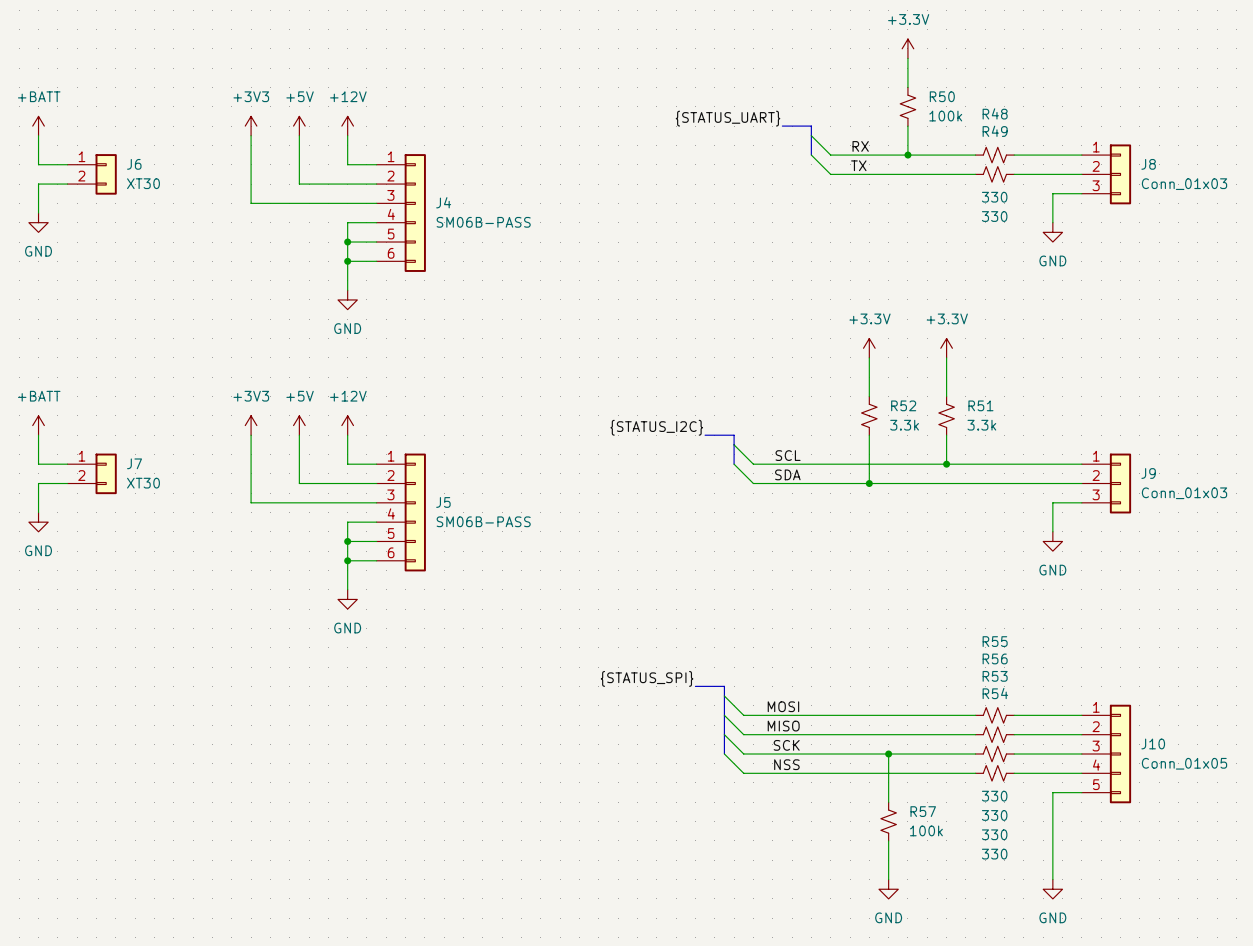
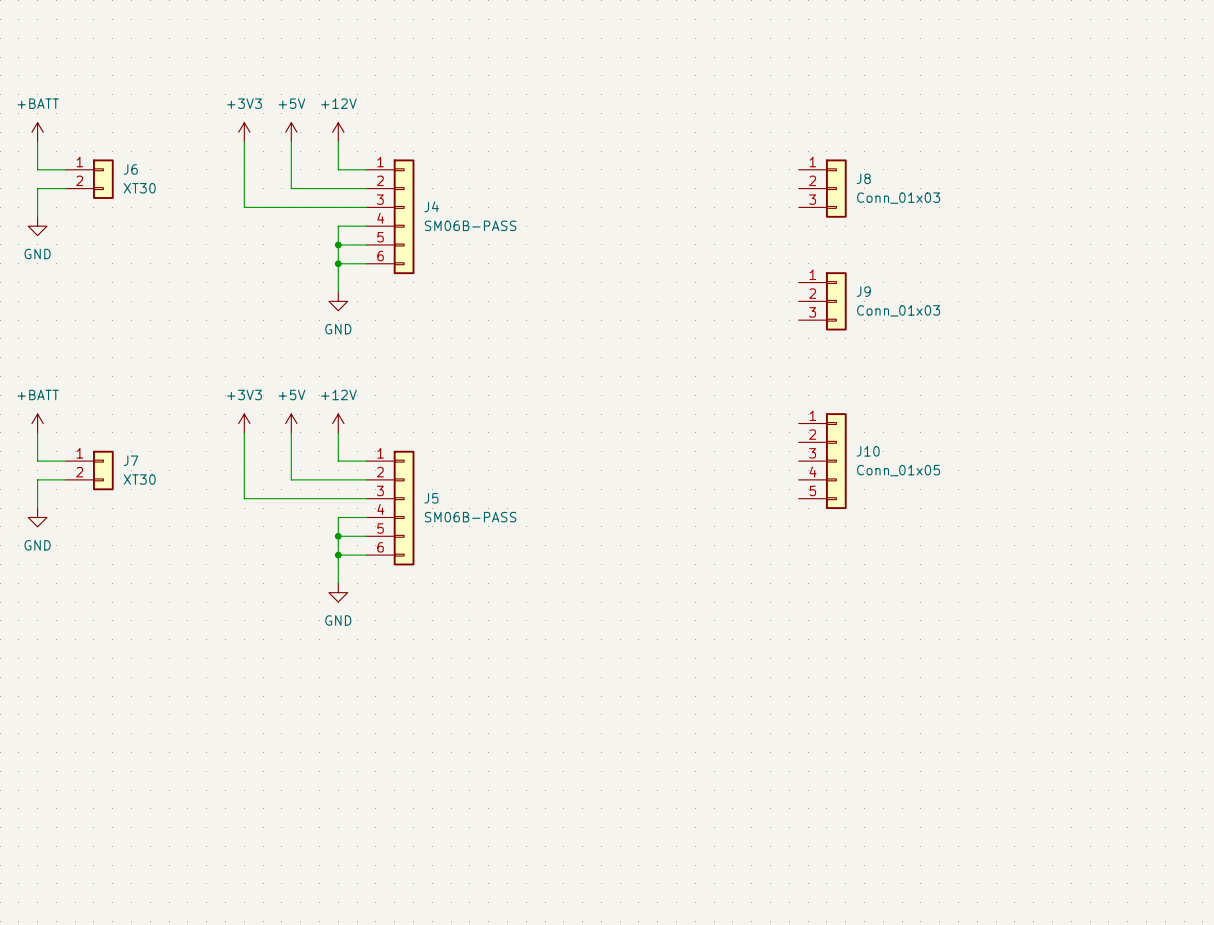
power symbol: +3.3V (907, 48) -> none
wire: (907, 58) (907, 87) -> none
R50: 100k (907, 106) -> none
label: {STATUS_UART} (728, 118) -> none
bus: (782, 126) (811, 126) (811, 155) -> none
wire: (907, 126) (907, 155) -> none
wire: (811, 135) (830, 155) (975, 155) -> none
label: RX (860, 146) -> none
wire: (811, 155) (830, 174) (975, 174) -> none
junction: (907, 155) -> none
R48: 330 (994, 155) -> none
wire: (1014, 155) (1081, 155) -> none
label: TX (858, 165) -> none
R49: 330 (994, 174) -> none
wire: (1014, 174) (1081, 174) -> none
J8 position: (1106, 174) -> (822, 188)
wire: (1081, 193) (1052, 193) (1052, 222) -> none
power symbol: GND (1052, 232) -> none
power symbol: +3.3V (869, 348) -> none
power symbol: +3.3V (946, 348) -> none
wire: (869, 357) (869, 396) -> none
wire: (946, 357) (946, 396) -> none
R52: 3.3k (869, 415) -> none
R51: 3.3k (946, 415) -> none
label: {STATUS_I2C} (656, 427) -> none
bus: (705, 435) (734, 435) (734, 464) -> none
wire: (946, 435) (946, 464) -> none
wire: (734, 444) (753, 464) (1081, 464) -> none
label: SCL (788, 455) -> none
wire: (734, 464) (753, 483) (1081, 483) -> none
junction: (946, 464) -> none
label: SDA (787, 474) -> none
junction: (869, 483) -> none
J9 position: (1106, 483) -> (822, 301)
wire: (1081, 502) (1052, 502) (1052, 531) -> none
power symbol: GND (1052, 541) -> none
label: {STATUS_SPI} (647, 678) -> none
bus: (695, 686) (724, 686) (724, 754) -> none
wire: (724, 696) (743, 715) (975, 715) -> none
label: MOSI (783, 706) -> none
wire: (724, 715) (743, 734) (975, 734) -> none
R55: 330 (994, 715) -> none
wire: (1014, 715) (1081, 715) -> none
label: MISO (783, 726) -> none
wire: (724, 734) (743, 754) (975, 754) -> none
R56: 330 (994, 734) -> none
wire: (1014, 734) (1081, 734) -> none
label: SCK (786, 745) -> none
wire: (724, 754) (743, 773) (975, 773) -> none
wire: (888, 754) (888, 802) -> none
junction: (888, 754) -> none
R53: 330 (994, 754) -> none
wire: (1014, 754) (1081, 754) -> none
J10 position: (1106, 754) -> (822, 461)
label: NSS (786, 764) -> none
R54: 330 (994, 773) -> none
wire: (1014, 773) (1081, 773) -> none
wire: (1081, 792) (1052, 792) (1052, 879) -> none
R57: 100k (888, 821) -> none
wire: (888, 840) (888, 879) -> none
power symbol: GND (888, 889) -> none
power symbol: GND (1052, 889) -> none

